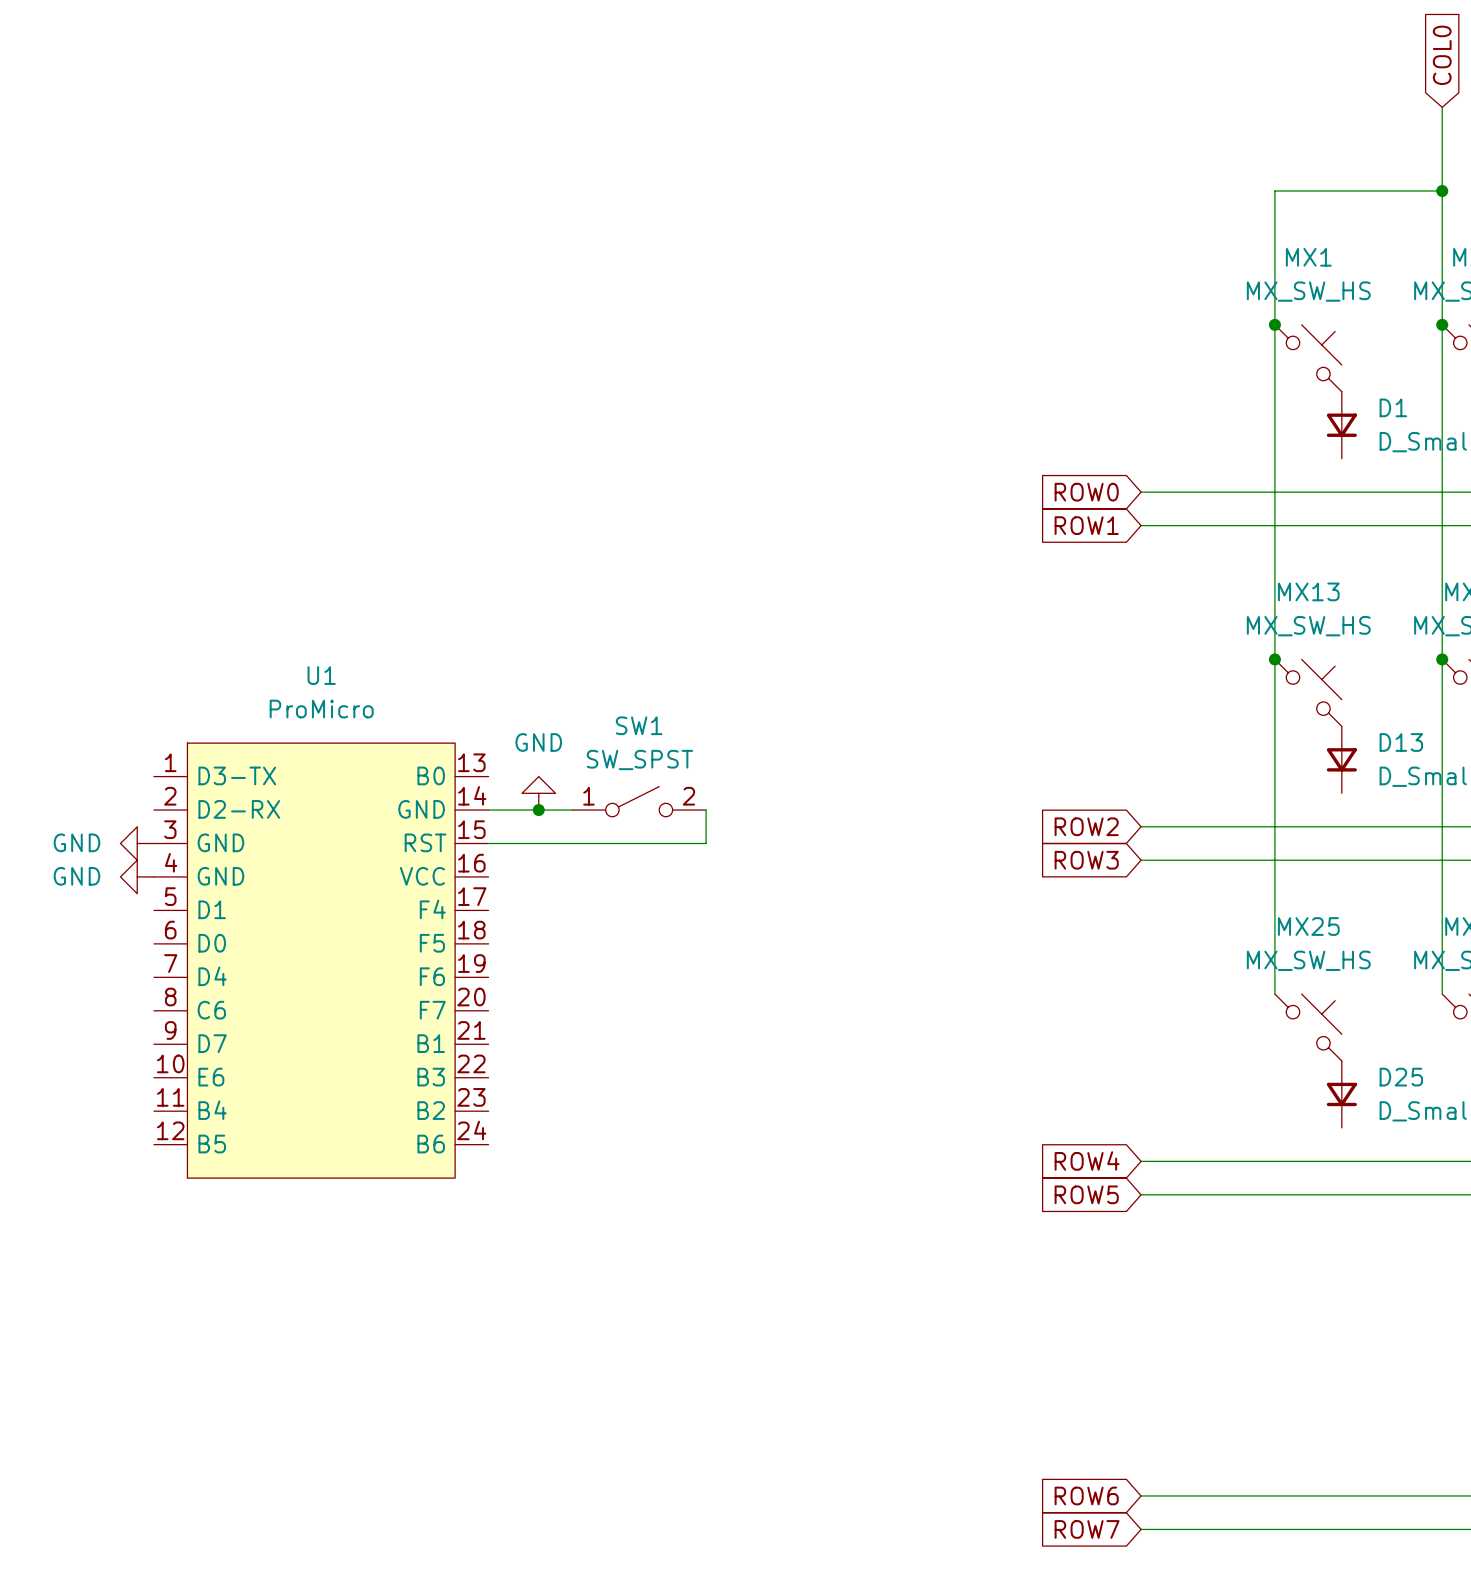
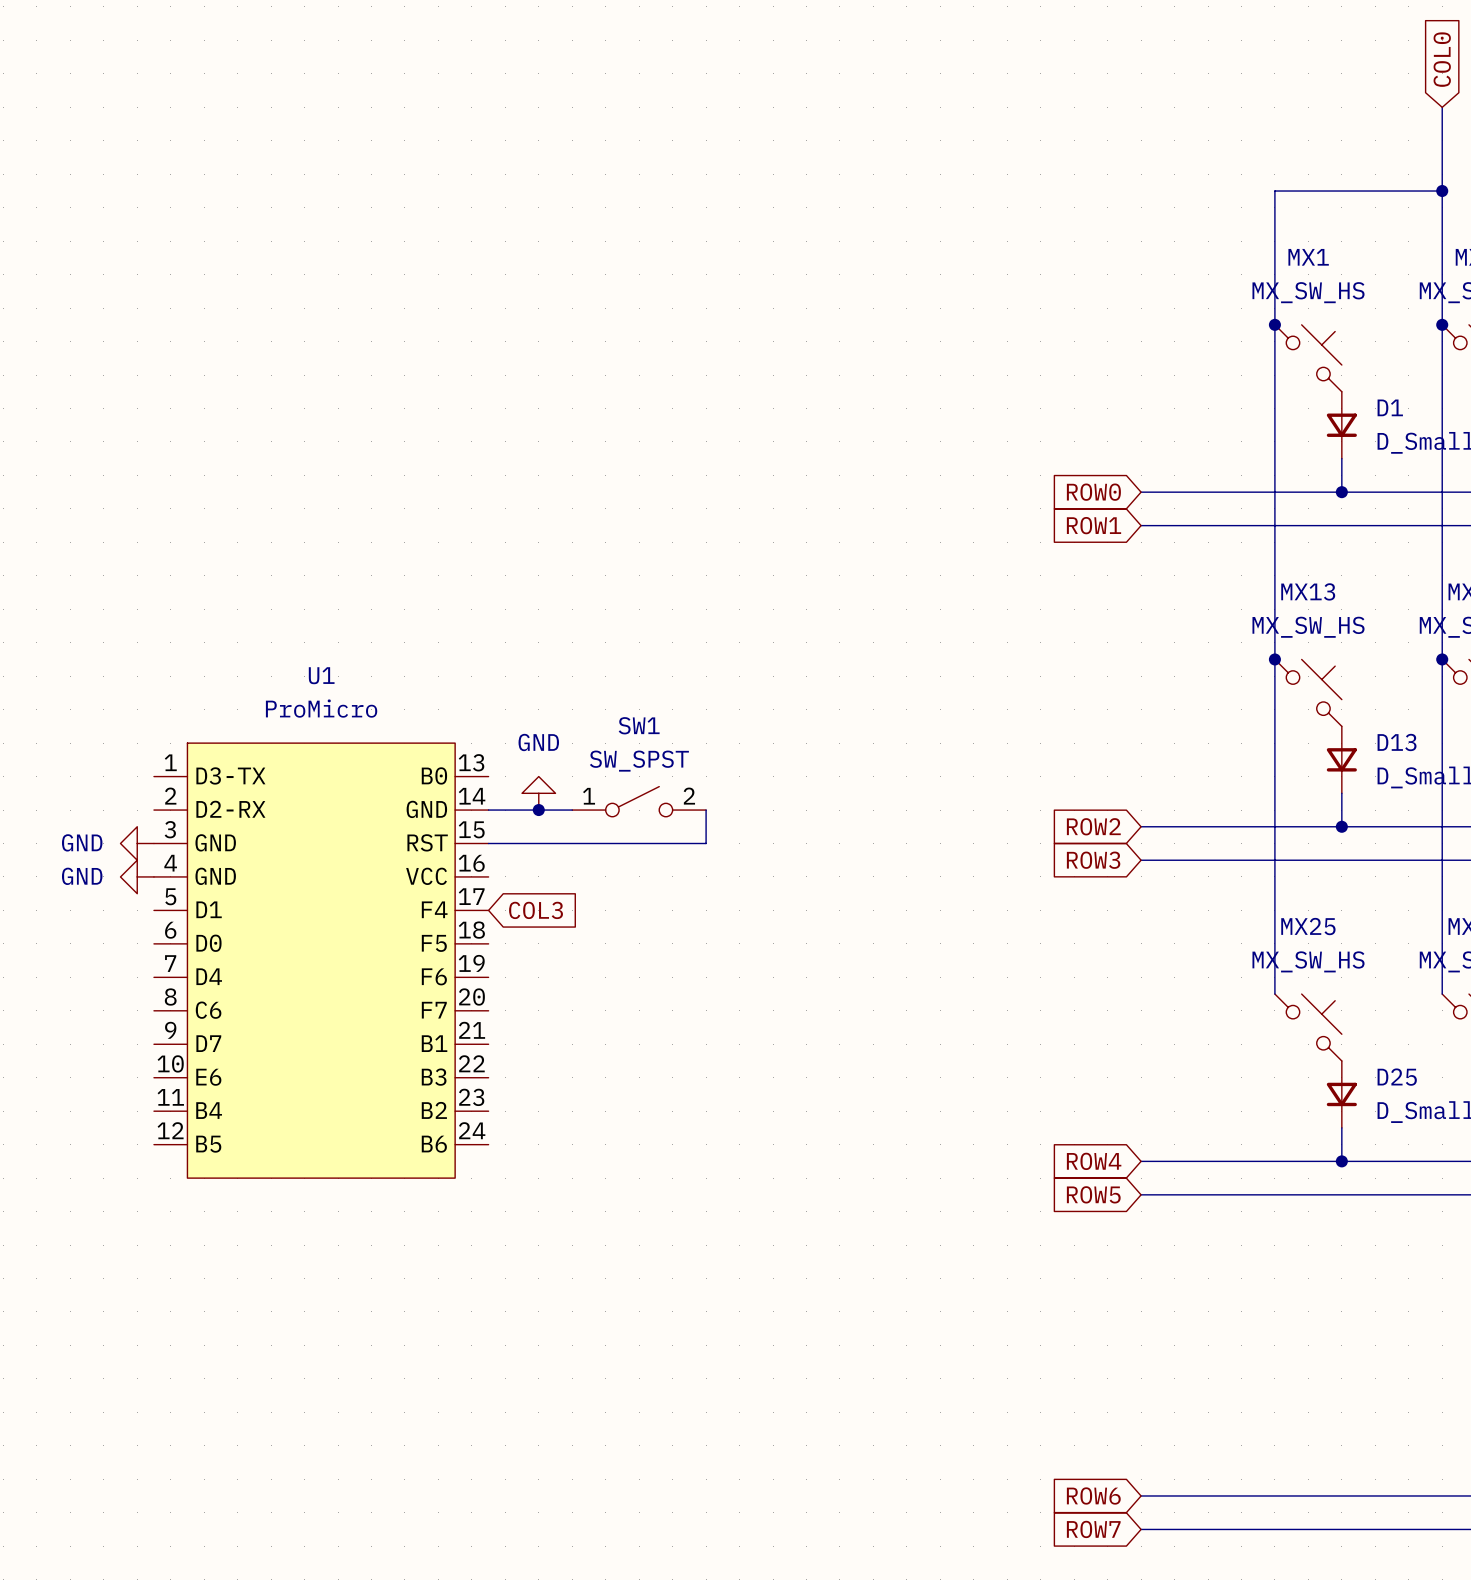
wire: none -> (1341, 458) (1341, 492)
junction: none -> (1341, 492)
wire: none -> (1341, 793) (1341, 826)
junction: none -> (1341, 826)
global label: none -> COL3 (536, 910)
wire: none -> (1341, 1127) (1341, 1161)
junction: none -> (1341, 1161)

